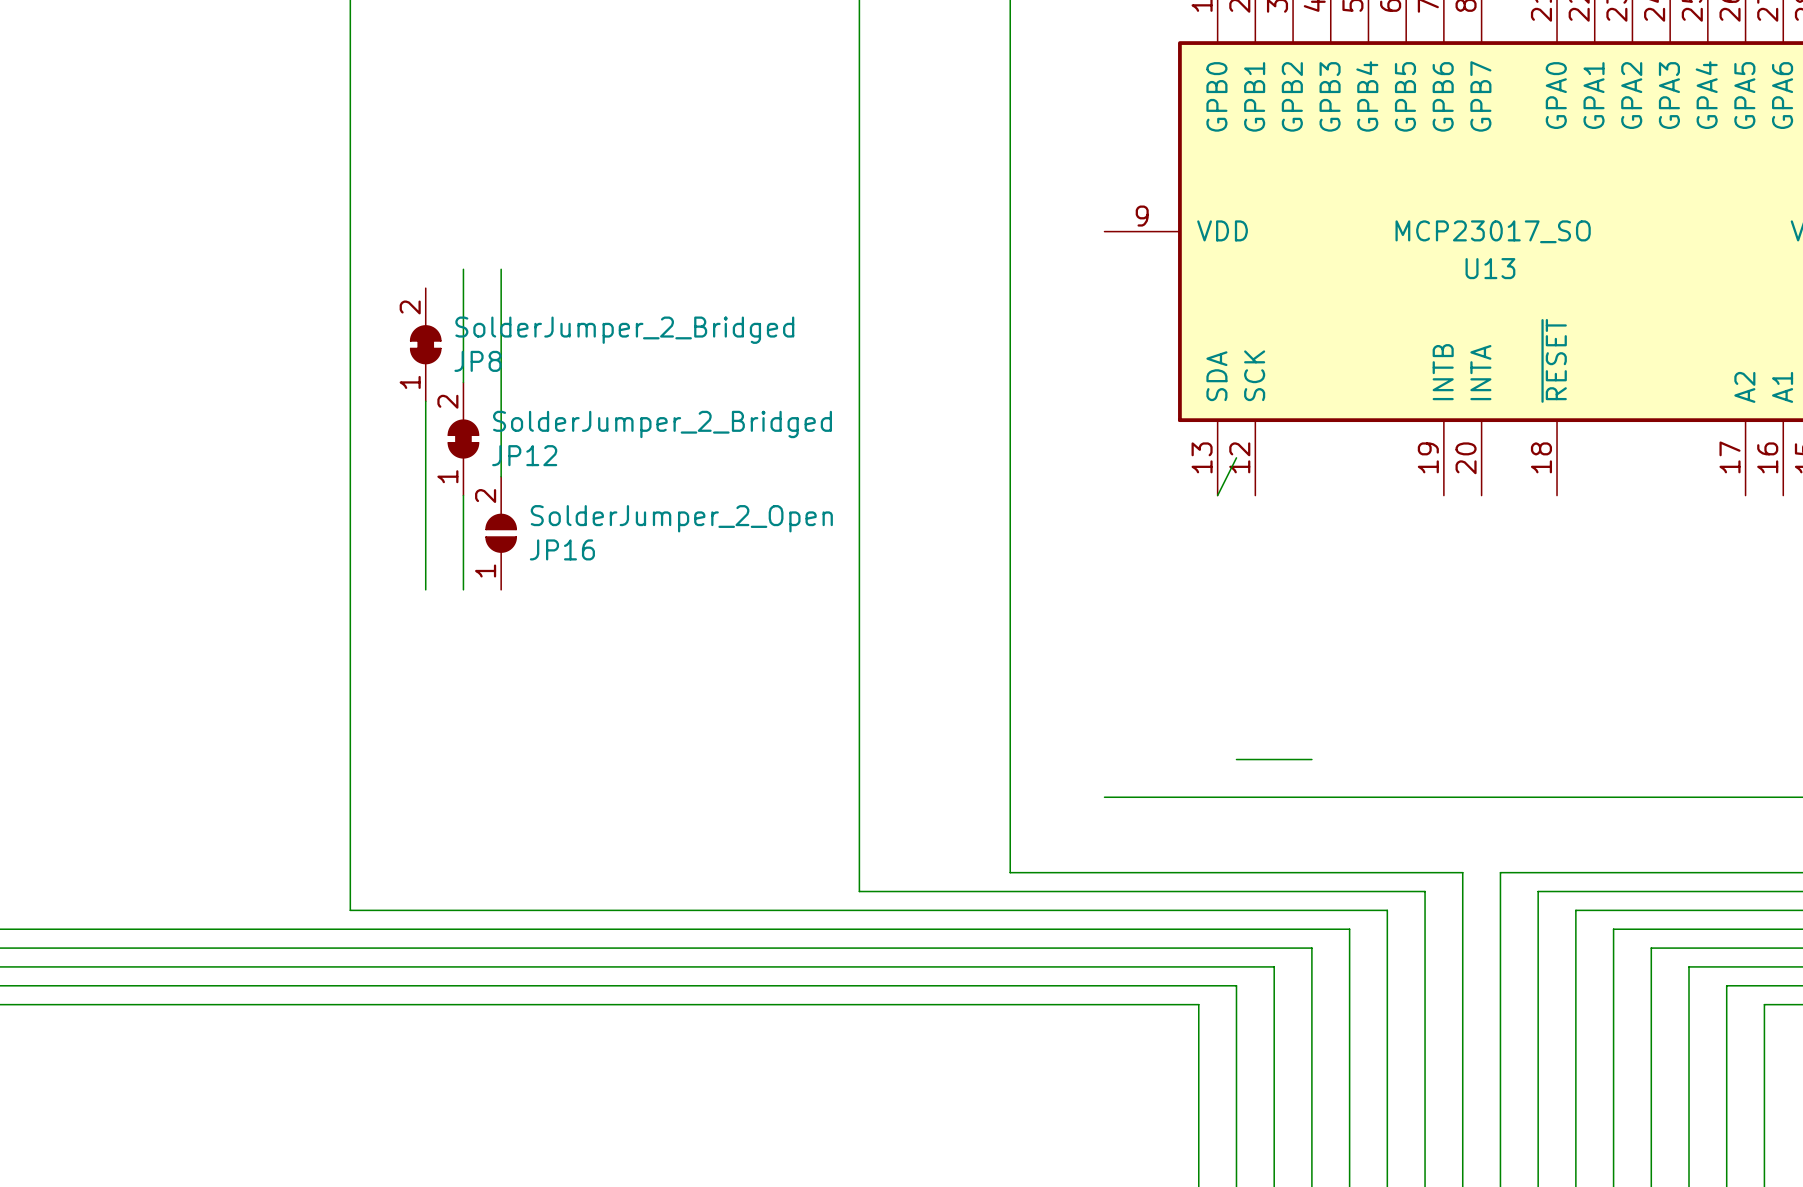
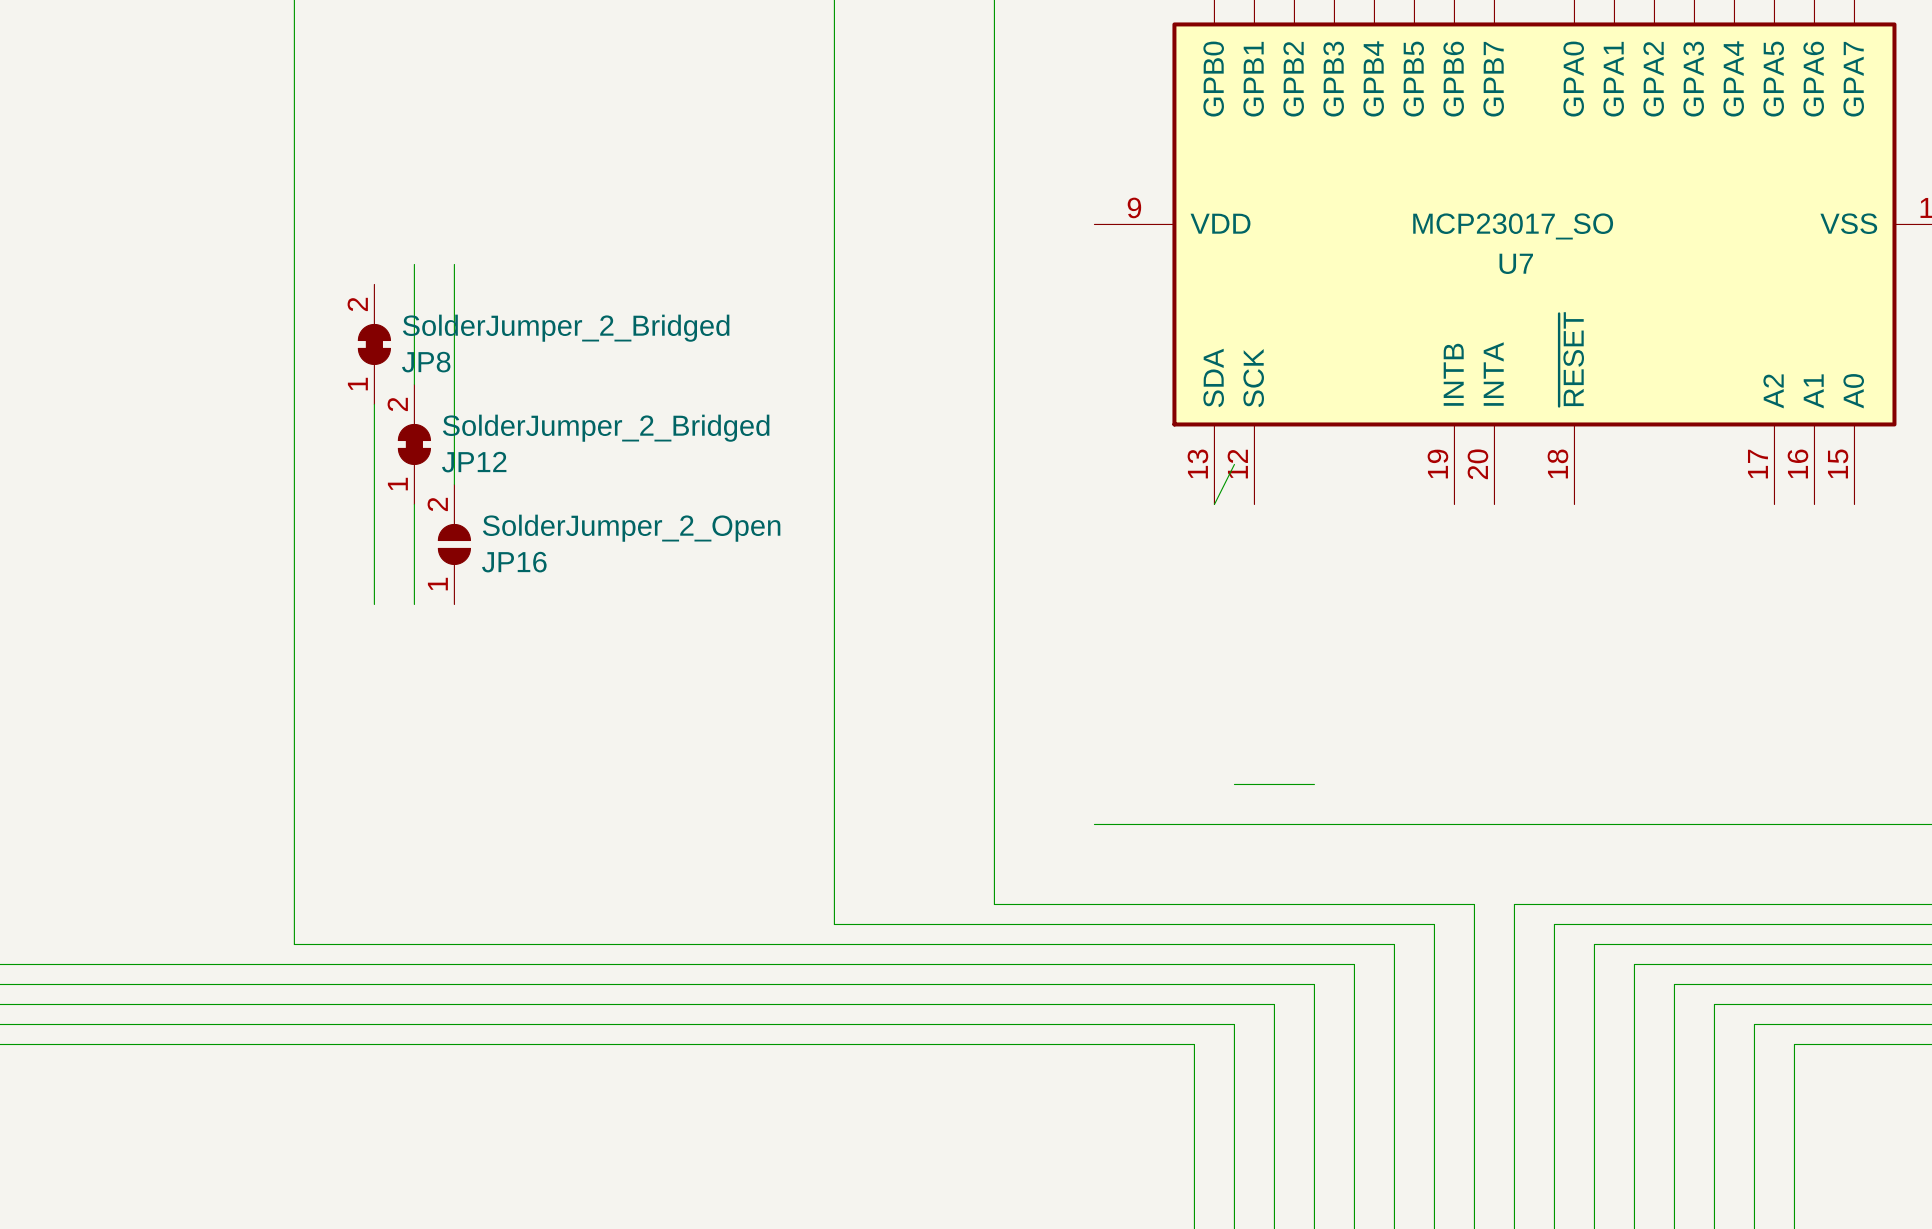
U13 name: U13 (1490, 268) -> U7 (1516, 263)

